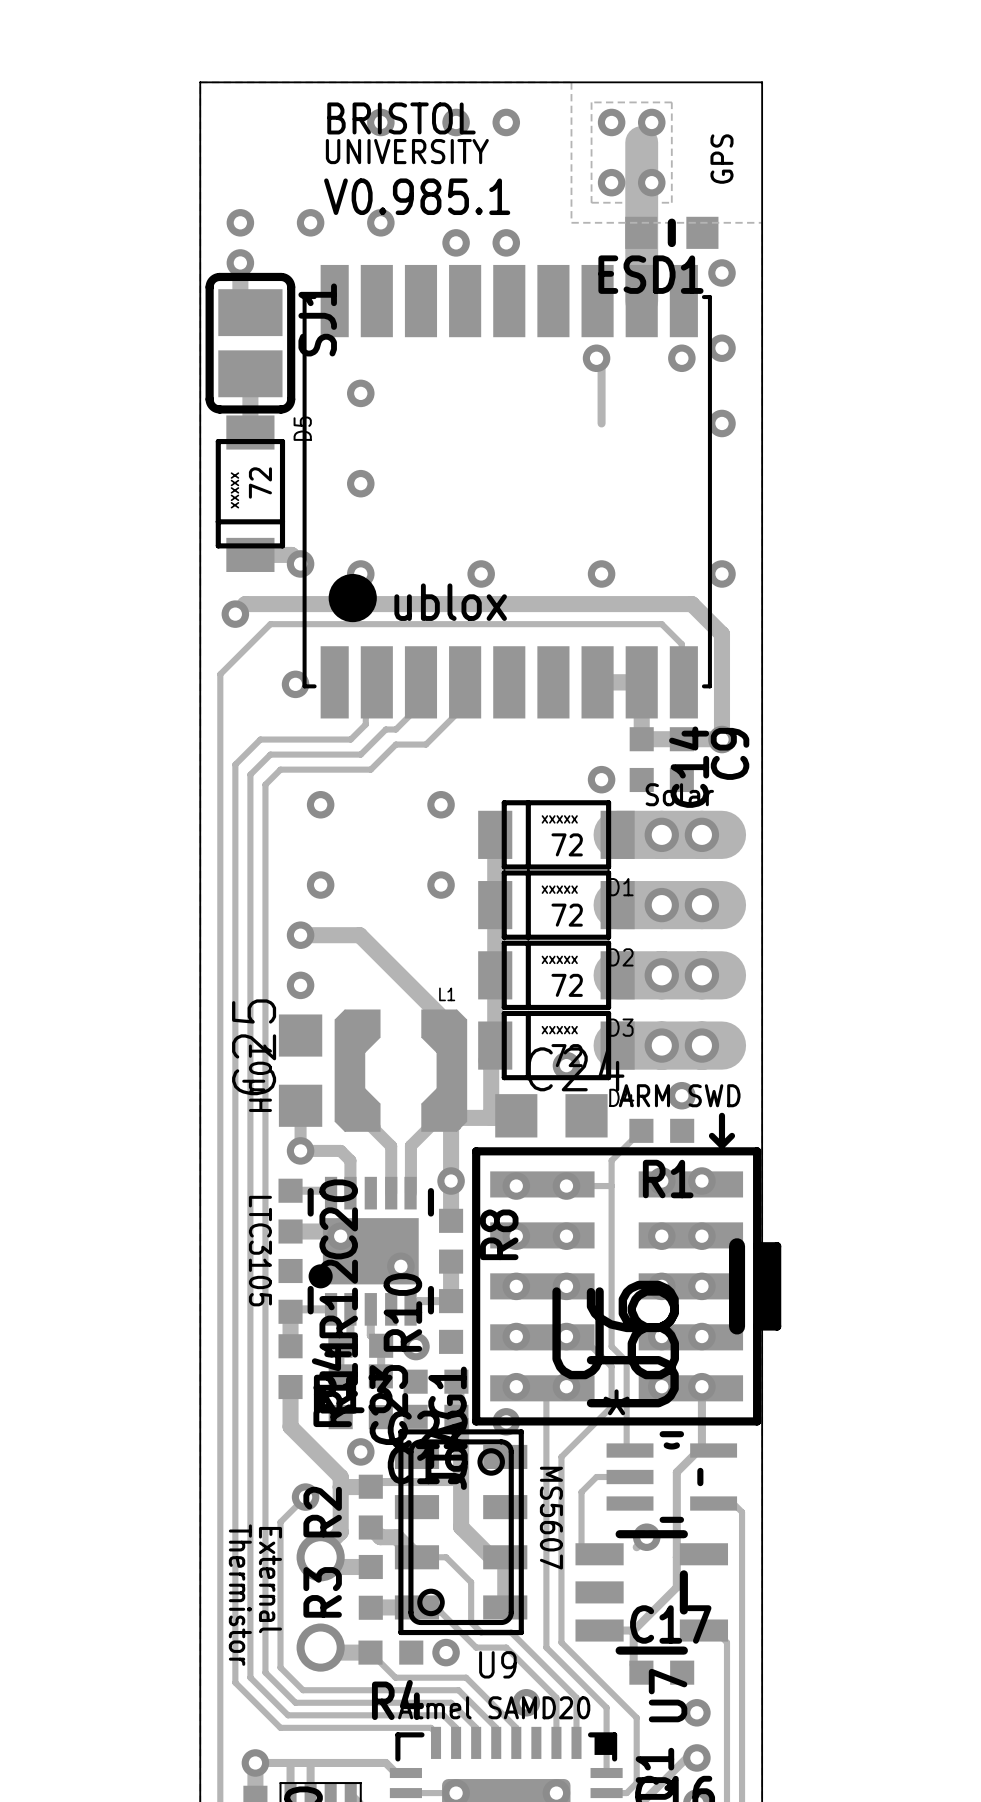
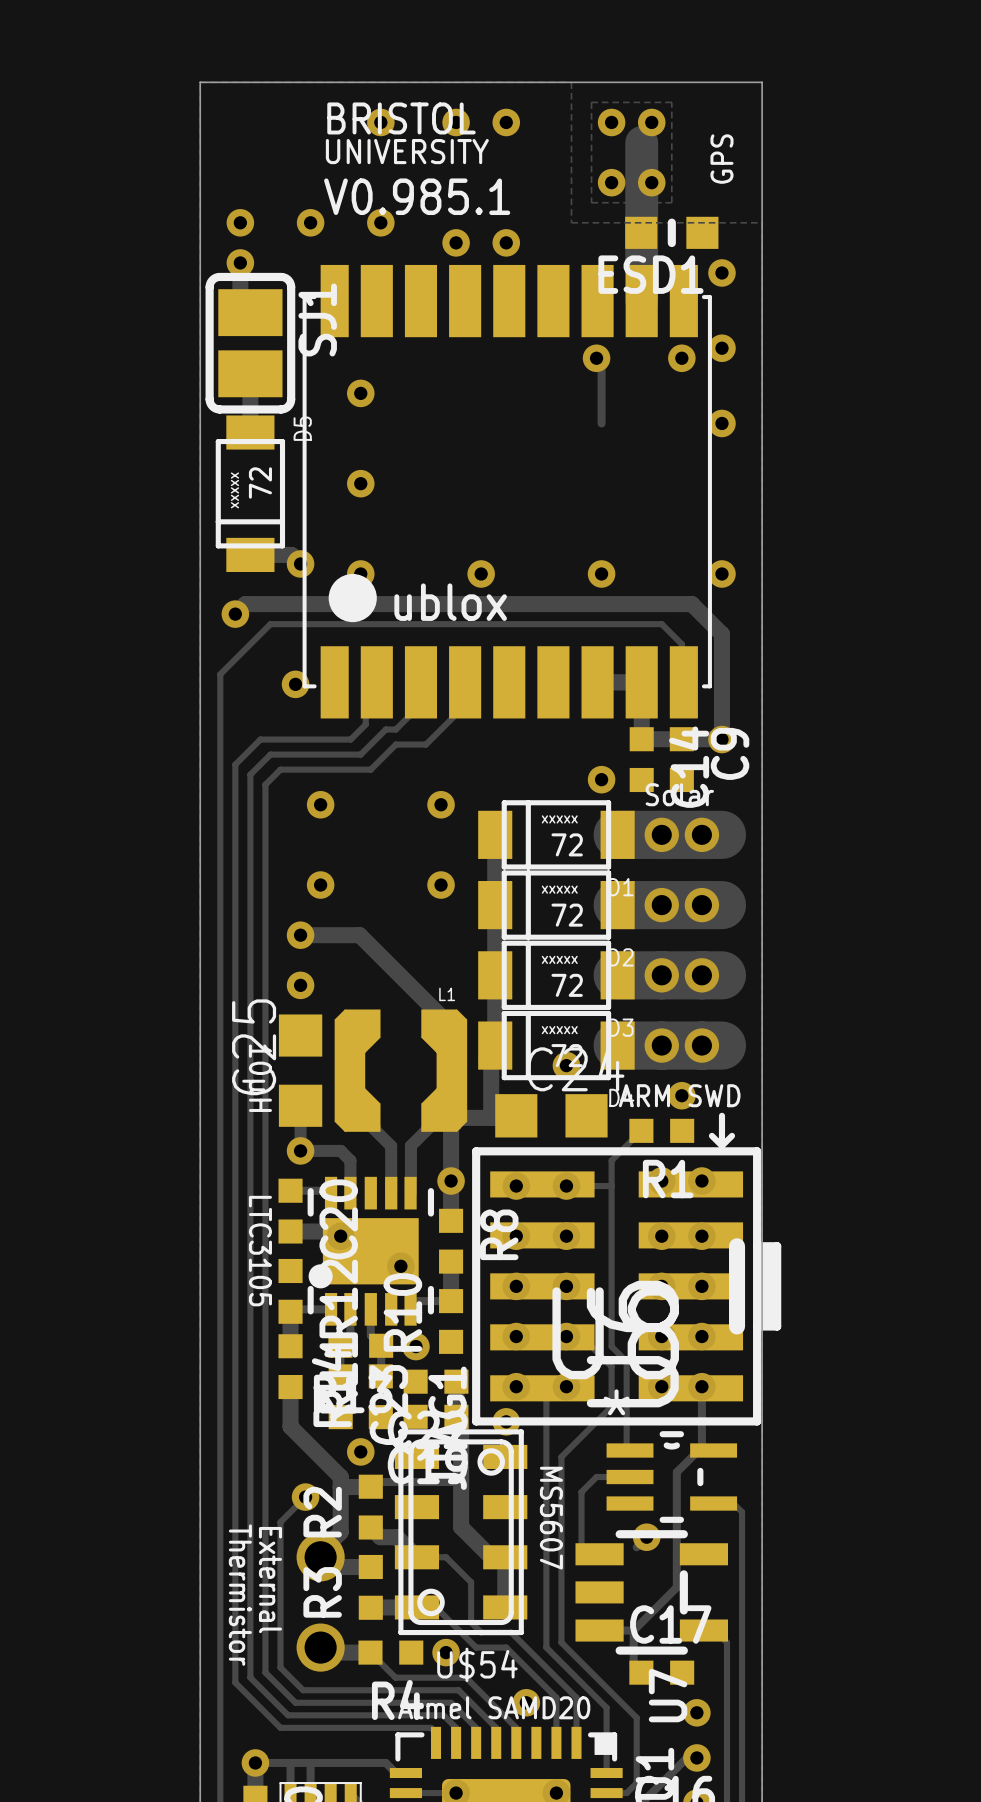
U9 name: U9 (497, 1664) -> U$54 (477, 1664)

